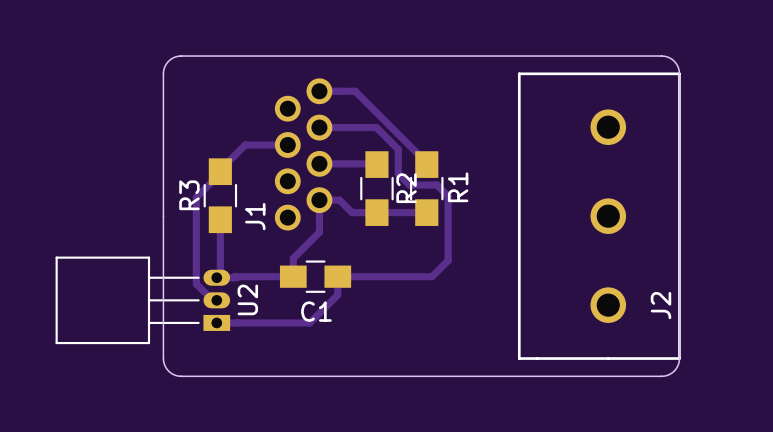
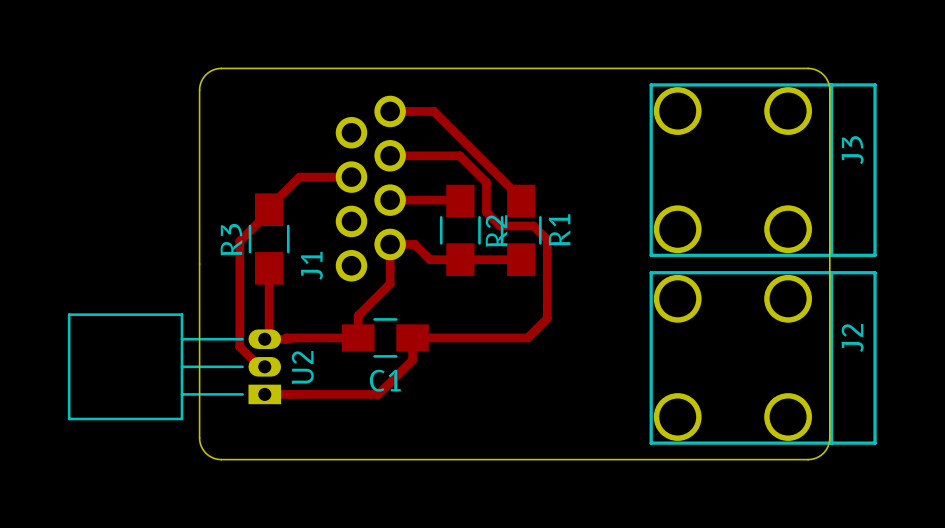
J2 footprint: [517, 72, 681, 360] -> [649, 271, 877, 445]
J3: none -> (763, 170)
J2 name position: J2 (660, 305) -> J2 (852, 337)

